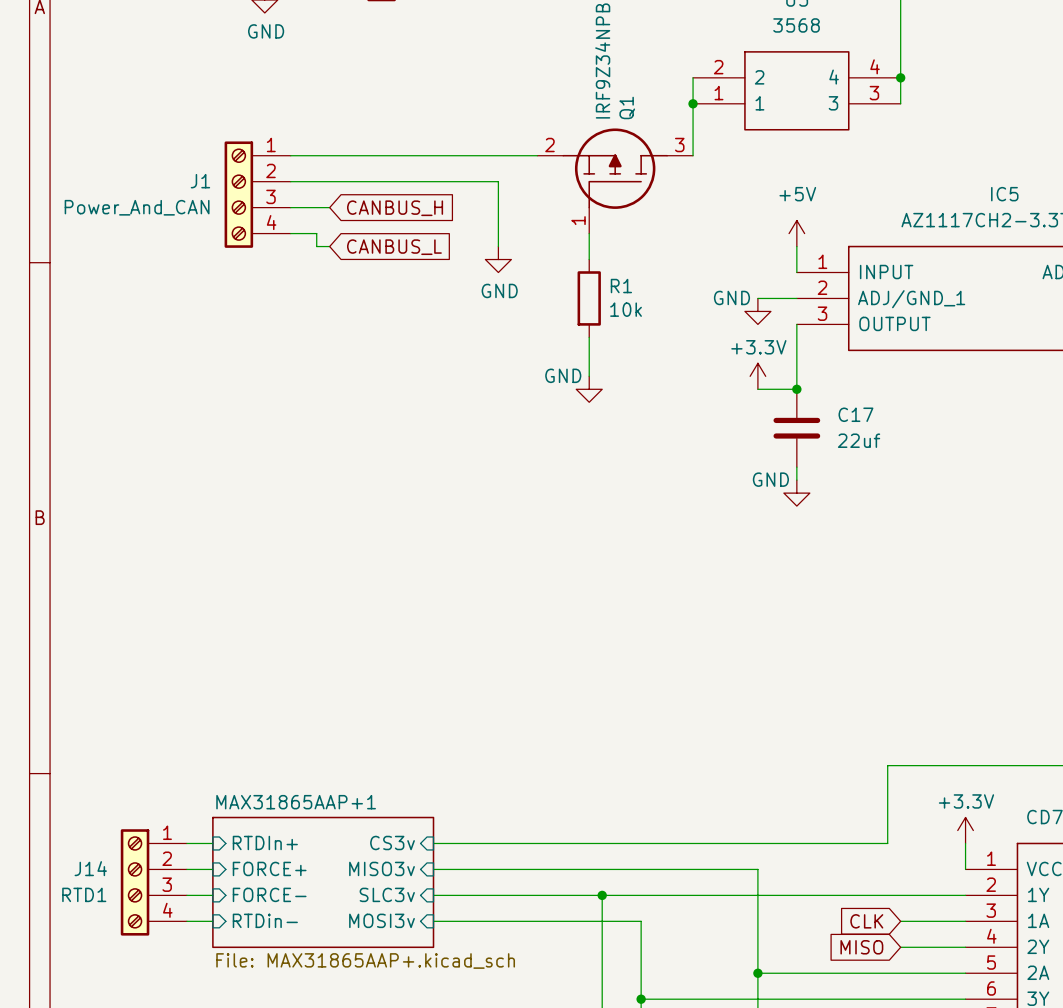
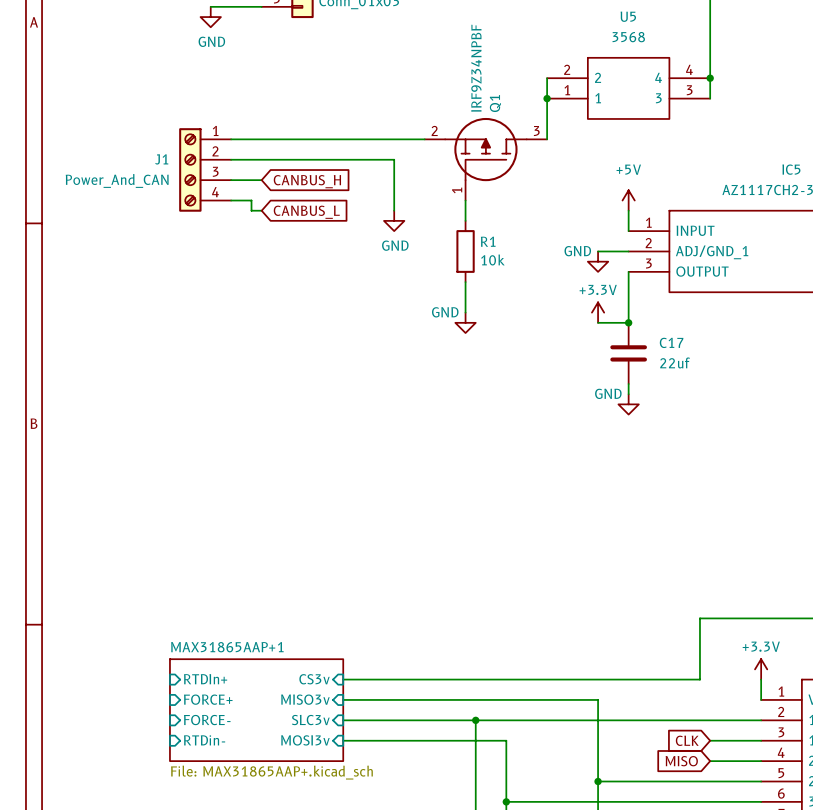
wire: (186, 843) (212, 843) -> none
wire: (186, 869) (212, 869) -> none
J14: RTD1 (153, 882) -> none
wire: (186, 895) (212, 895) -> none
wire: (186, 921) (212, 921) -> none

